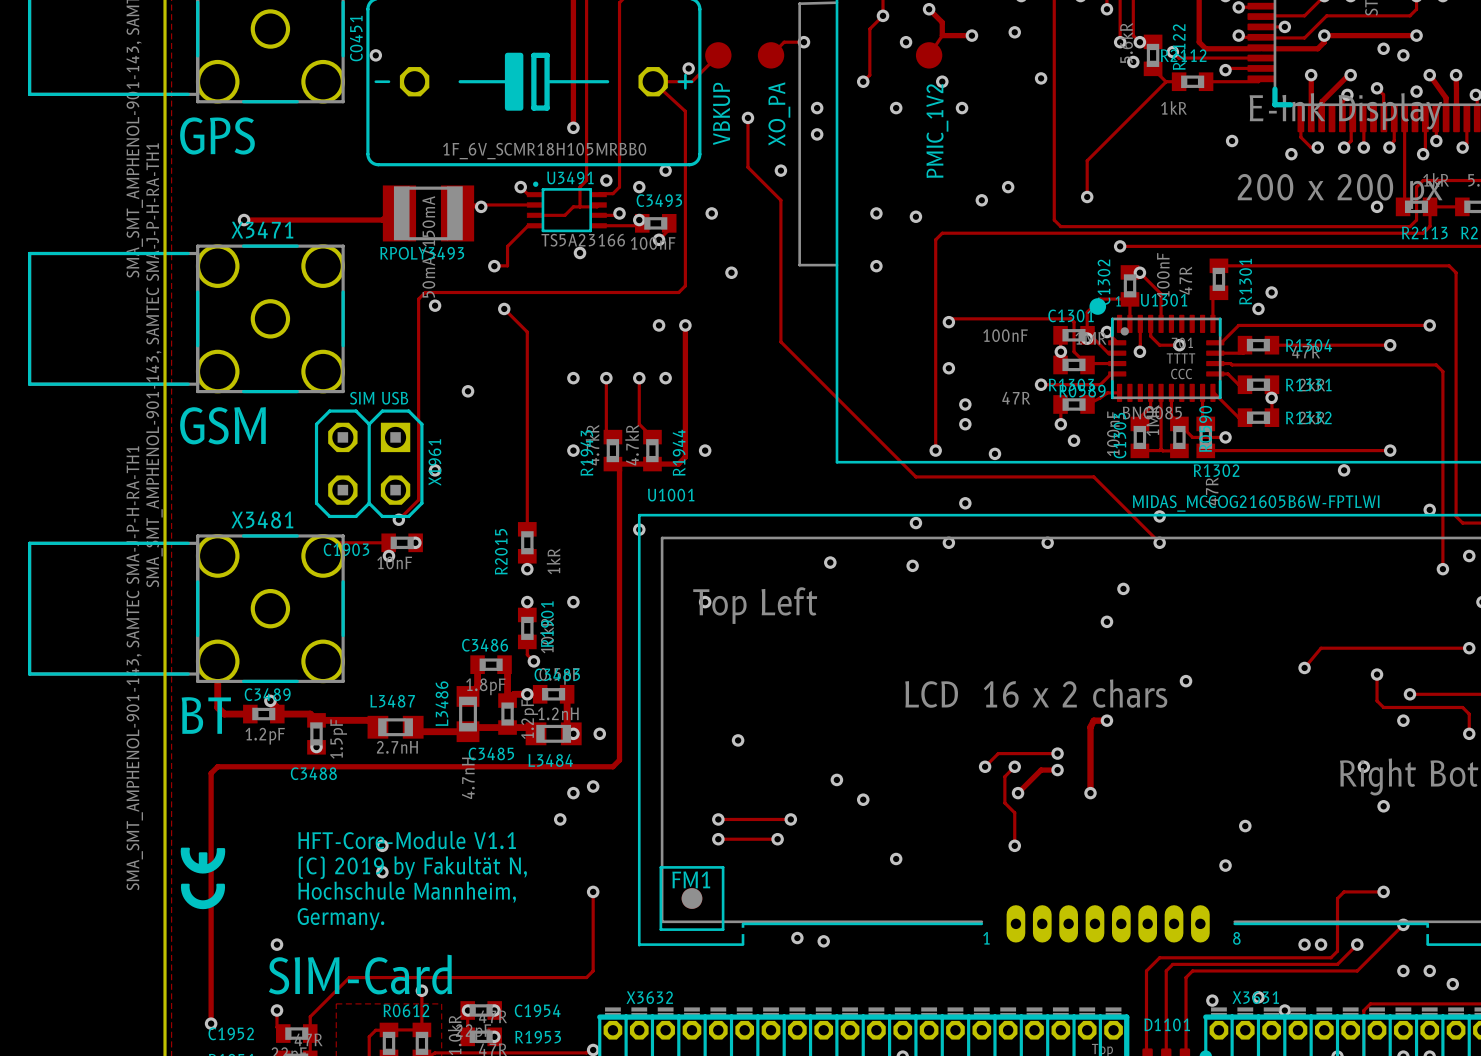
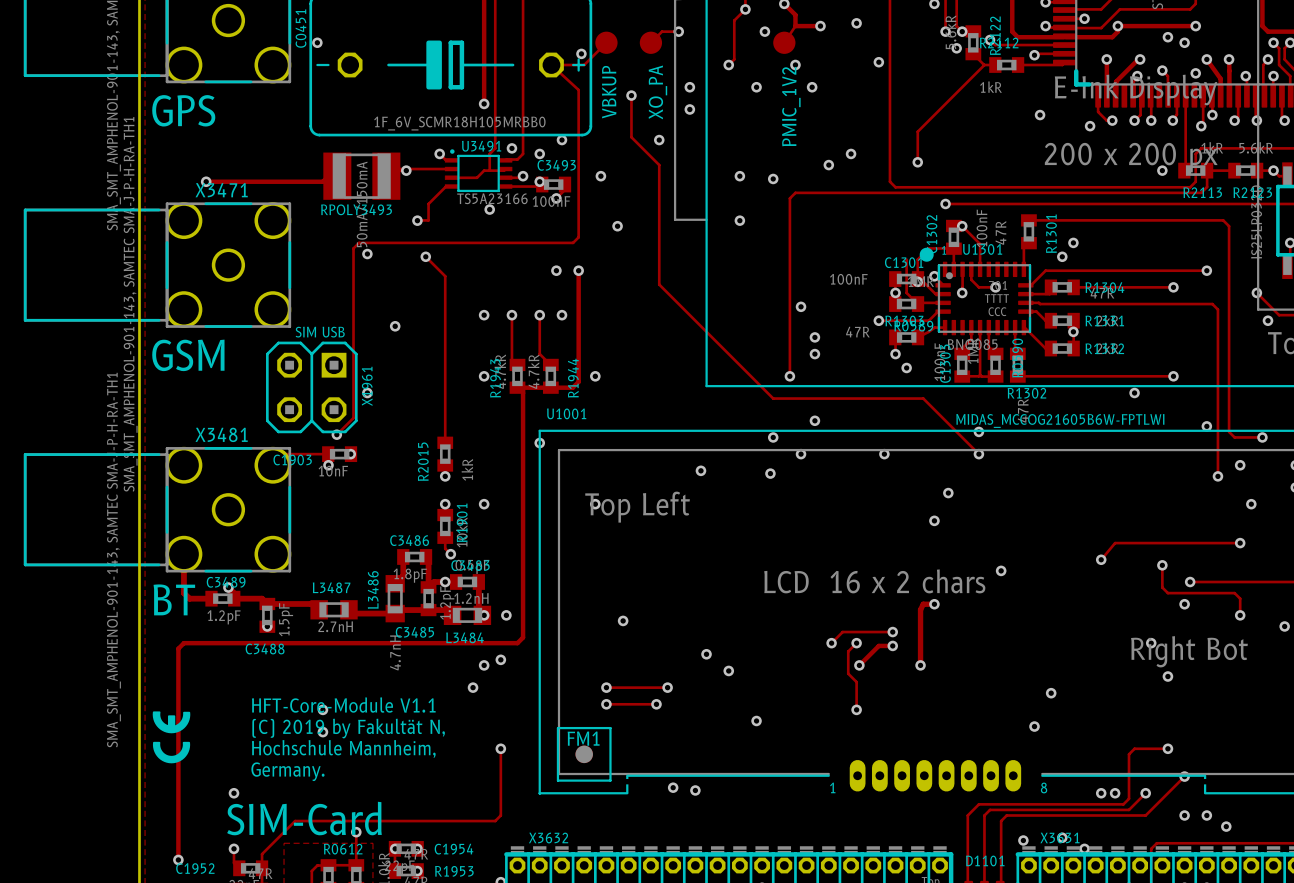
track: (948, 322) (952, 318) (1070, 318) (1074, 322) -> (906, 259) (906, 267)
via: (948, 322) -> none
track: (1179, 424) (1192, 437) (1225, 437) -> none
via: (1225, 437) -> none
via: (994, 453) -> none

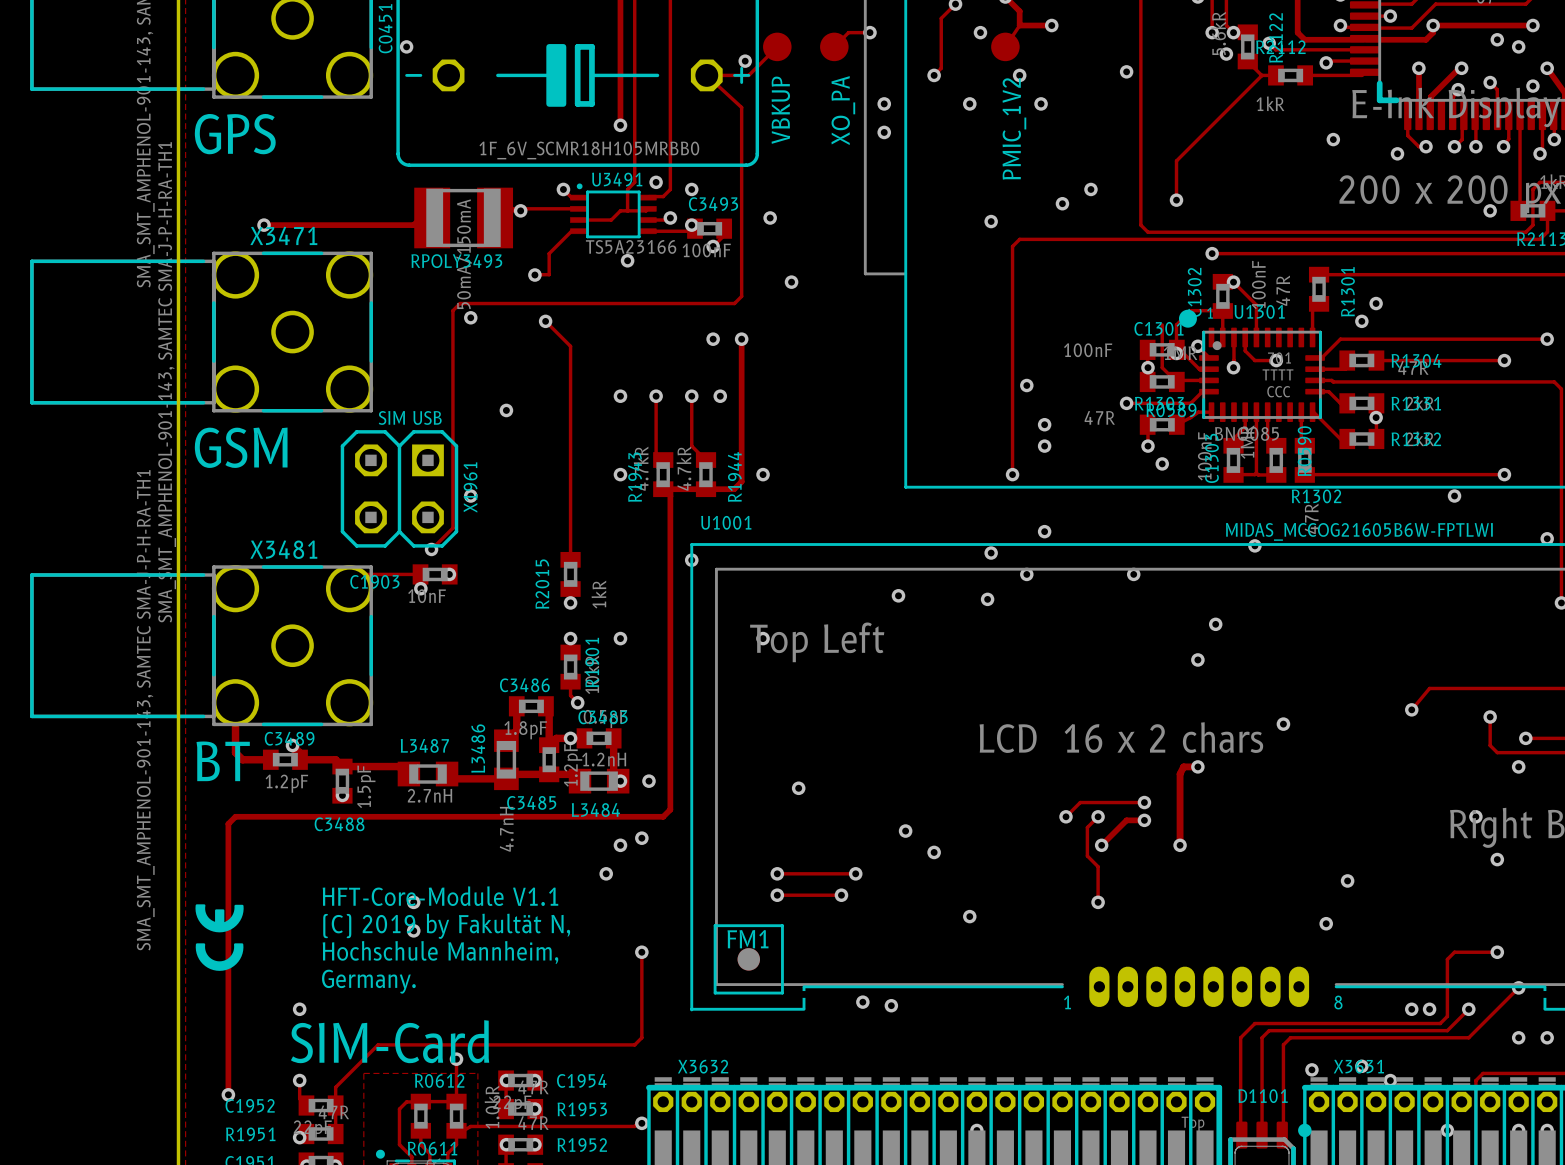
via: (856, 23) -> none
track: (631, 95) (631, 137) (659, 165) (659, 284) (773, 398) (923, 398) (978, 454) -> none
via: (631, 95) -> none
via: (561, 140) -> none
via: (659, 140) -> none
via: (739, 176) -> none
via: (739, 220) -> none
via: (978, 454) -> none

